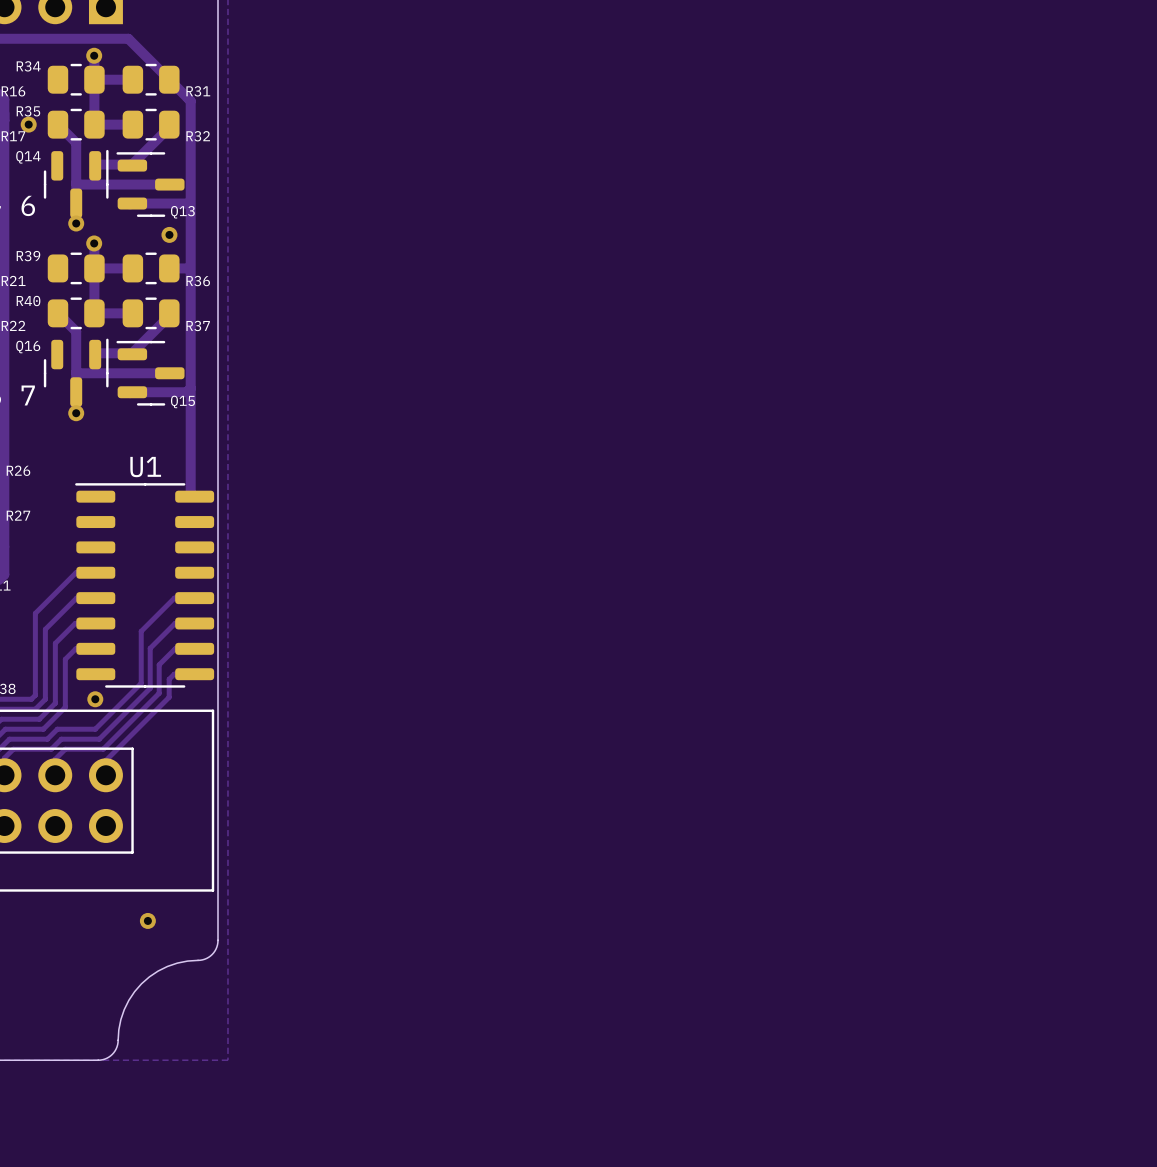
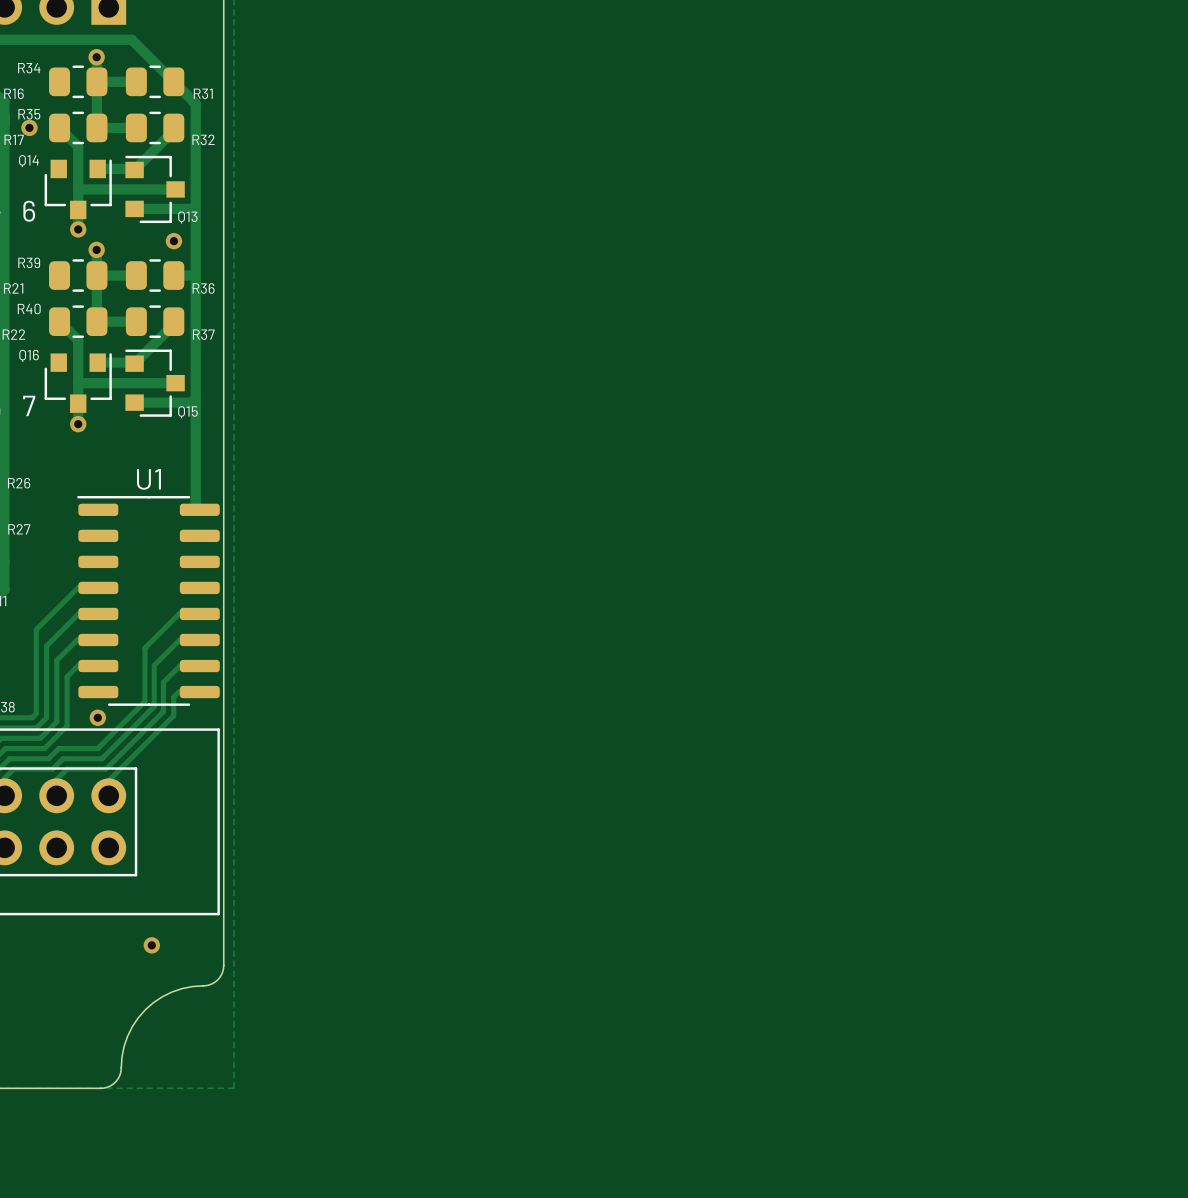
Q14 footprint: [43, 149, 109, 219] -> [44, 159, 112, 220]
Q13 footprint: [116, 152, 185, 217] -> [125, 155, 185, 224]
Q16 footprint: [43, 338, 109, 407] -> [44, 353, 112, 413]
Q15 footprint: [116, 340, 185, 406] -> [125, 349, 185, 417]

